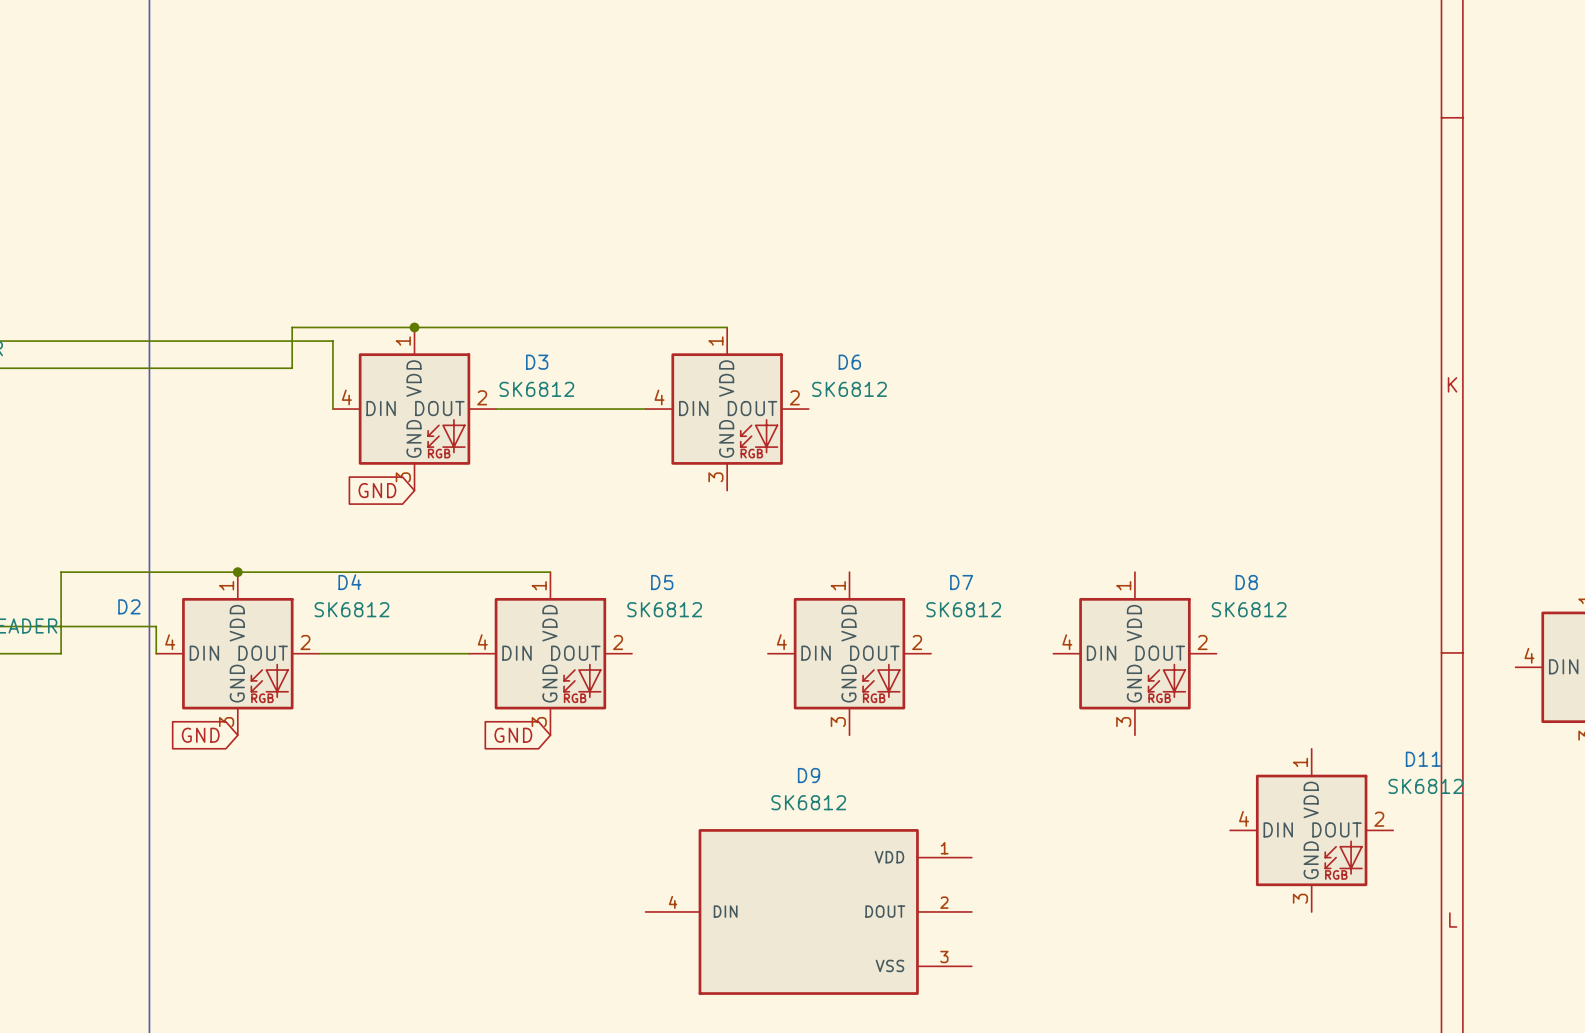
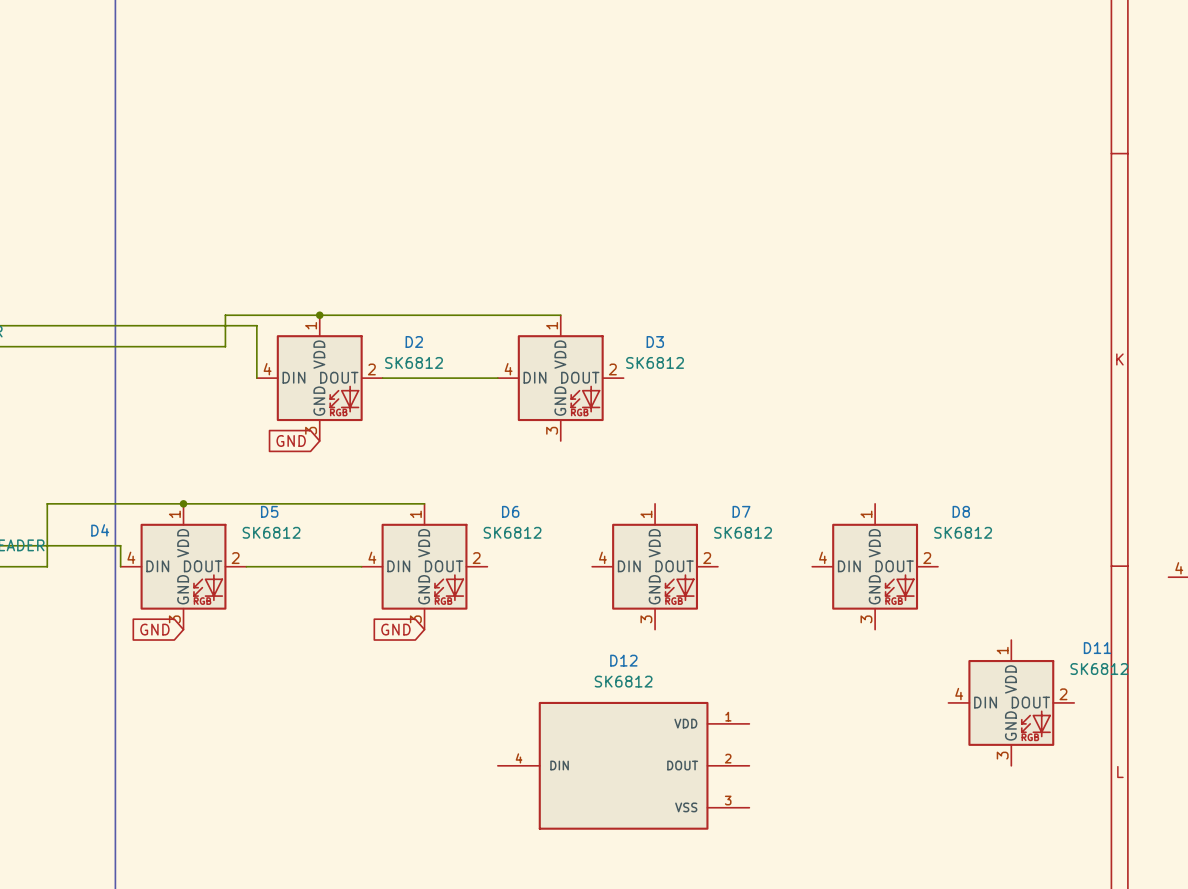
D3 name: D3 (537, 362) -> D2 (414, 341)
D6 name: D6 (849, 362) -> D3 (655, 341)
D4 name: D4 (349, 582) -> D5 (269, 511)
D5 name: D5 (662, 582) -> D6 (510, 511)
D2 name: D2 (129, 606) -> D4 (100, 530)
D9 name: D9 (809, 775) -> D12 (623, 660)

